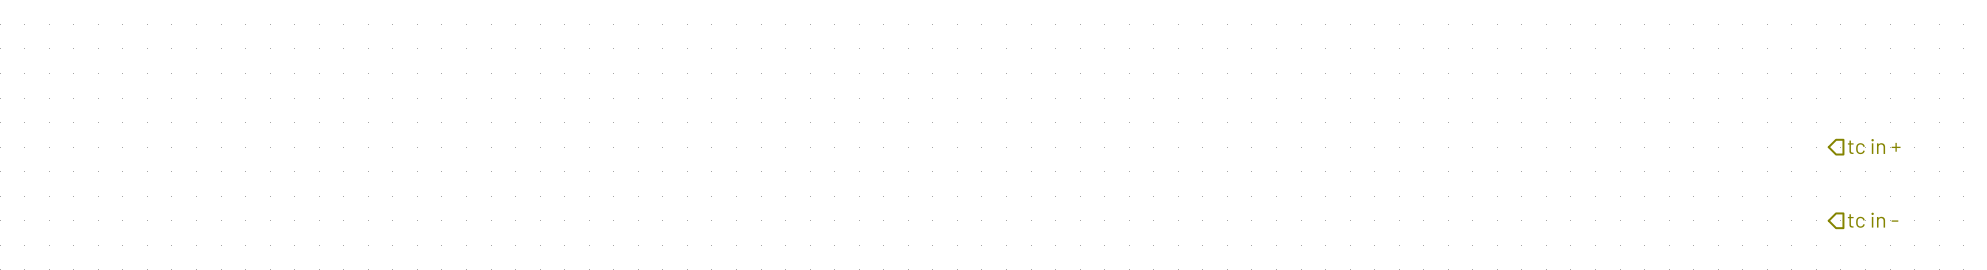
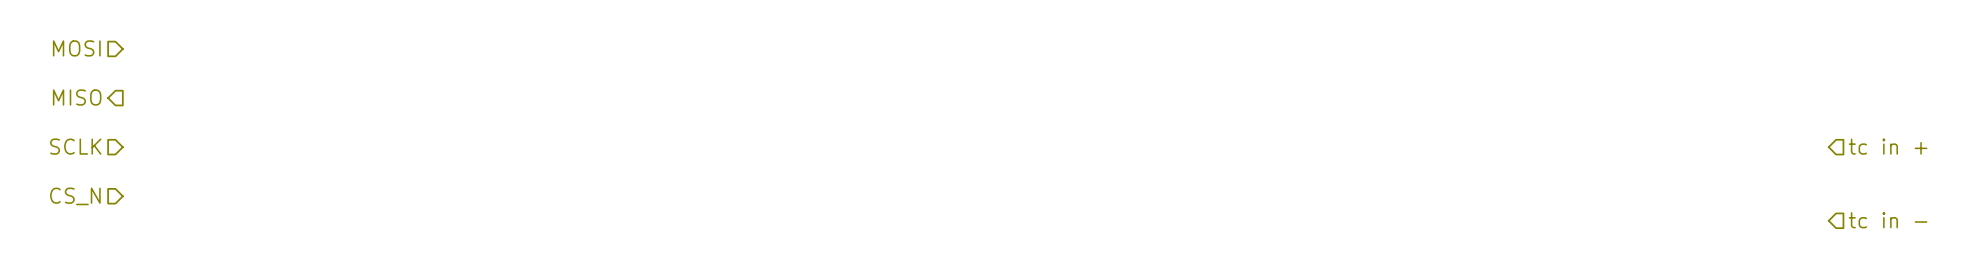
hierarchical label: none -> MOSI (76, 48)
hierarchical label: none -> MISO (77, 97)
hierarchical label: none -> SCLK (75, 146)
hierarchical label: none -> CS_N (75, 196)

